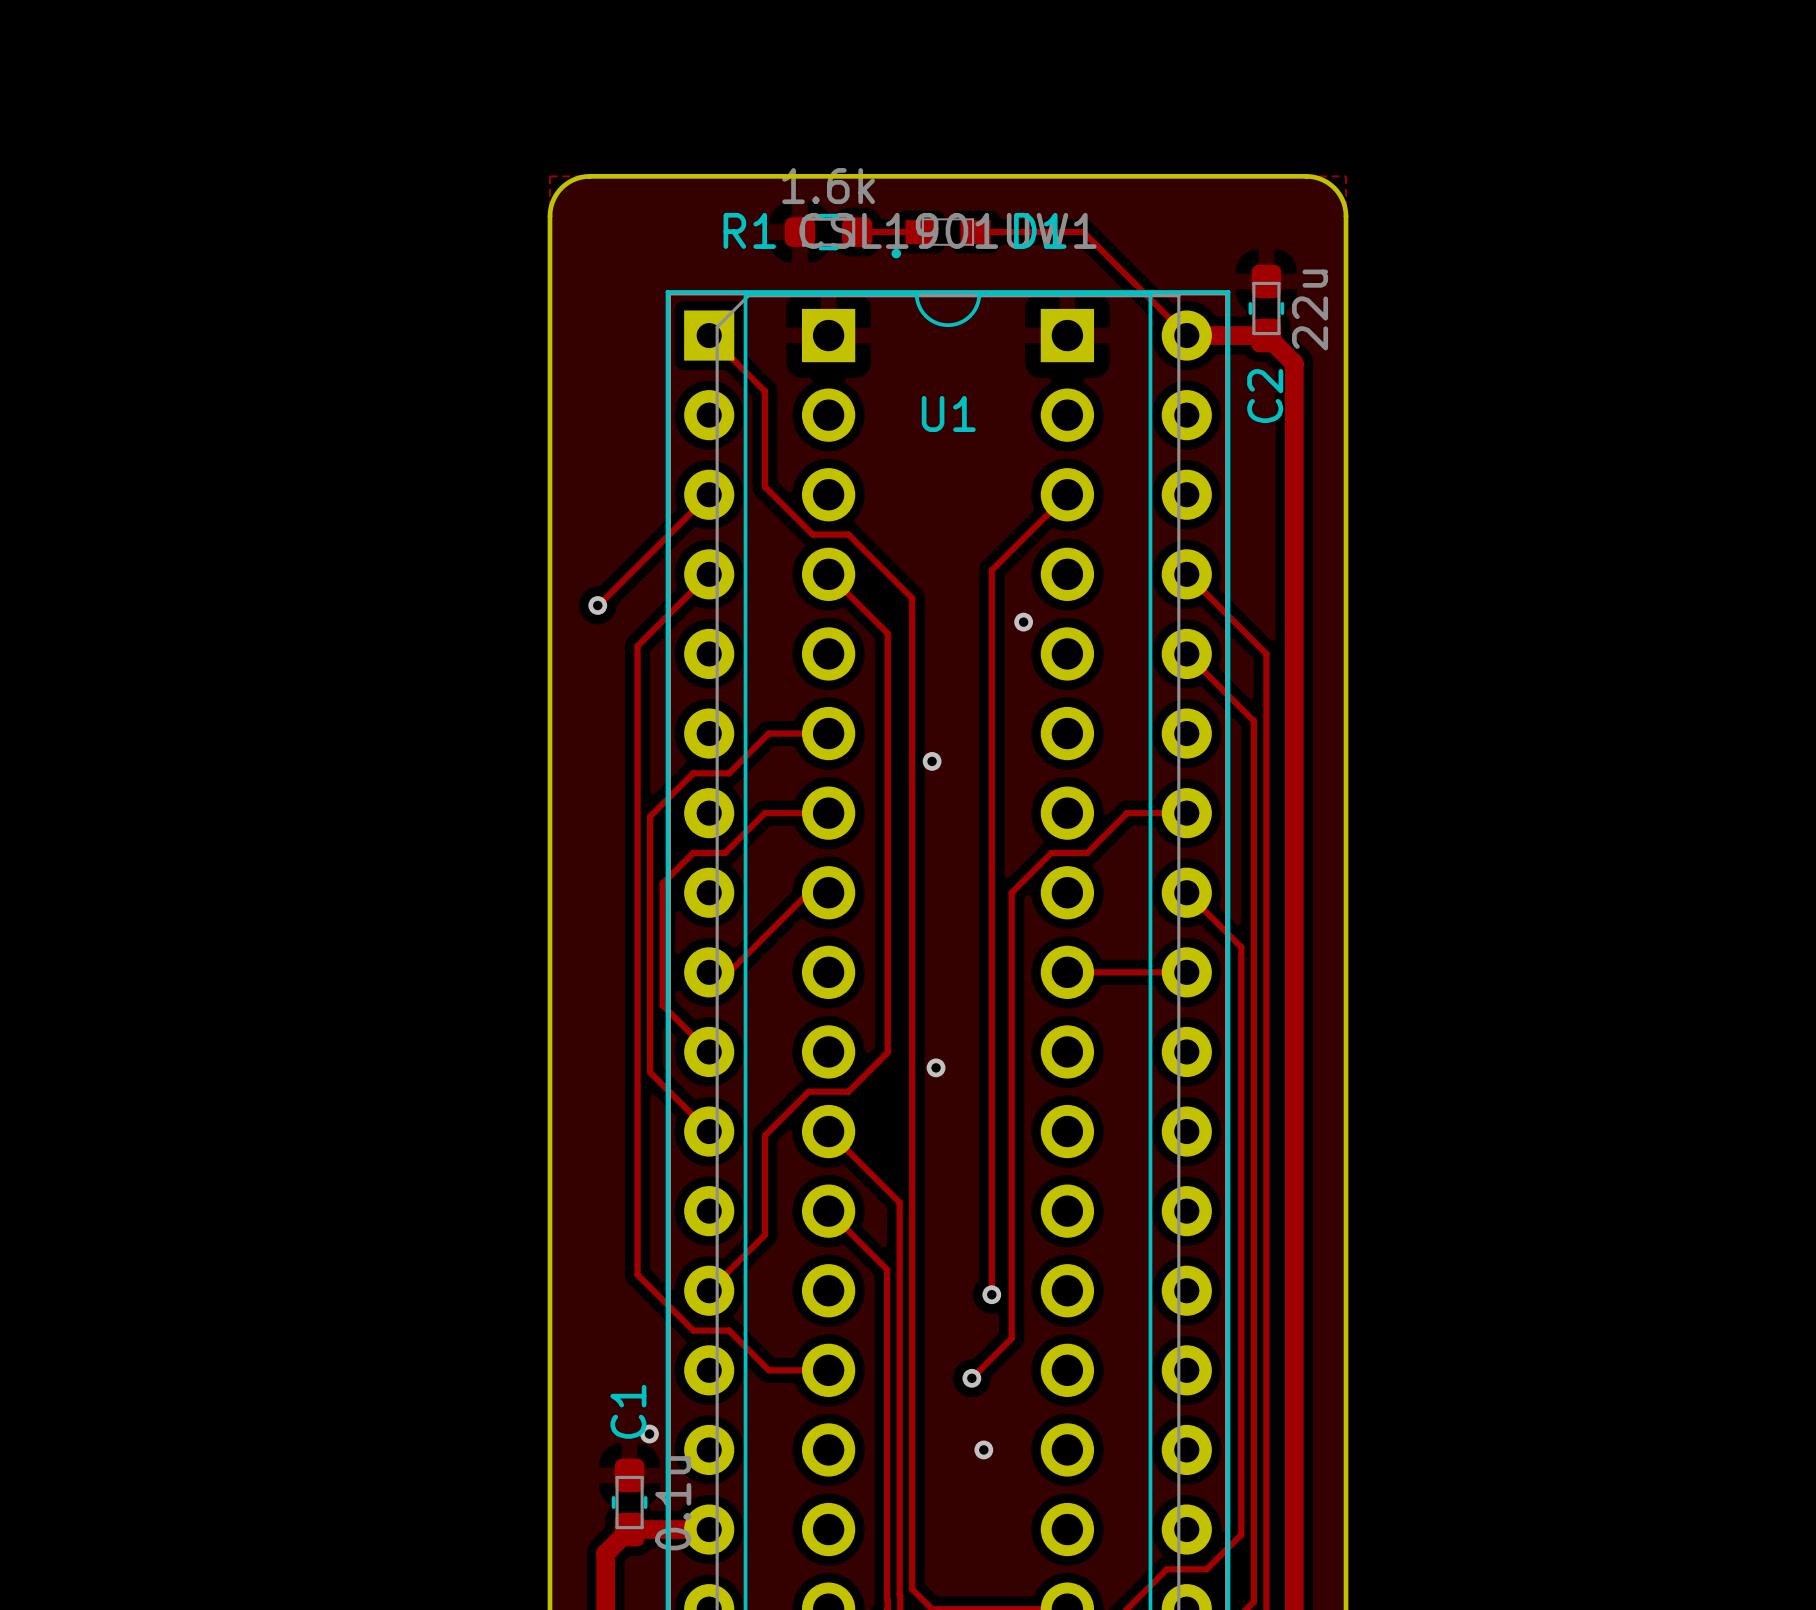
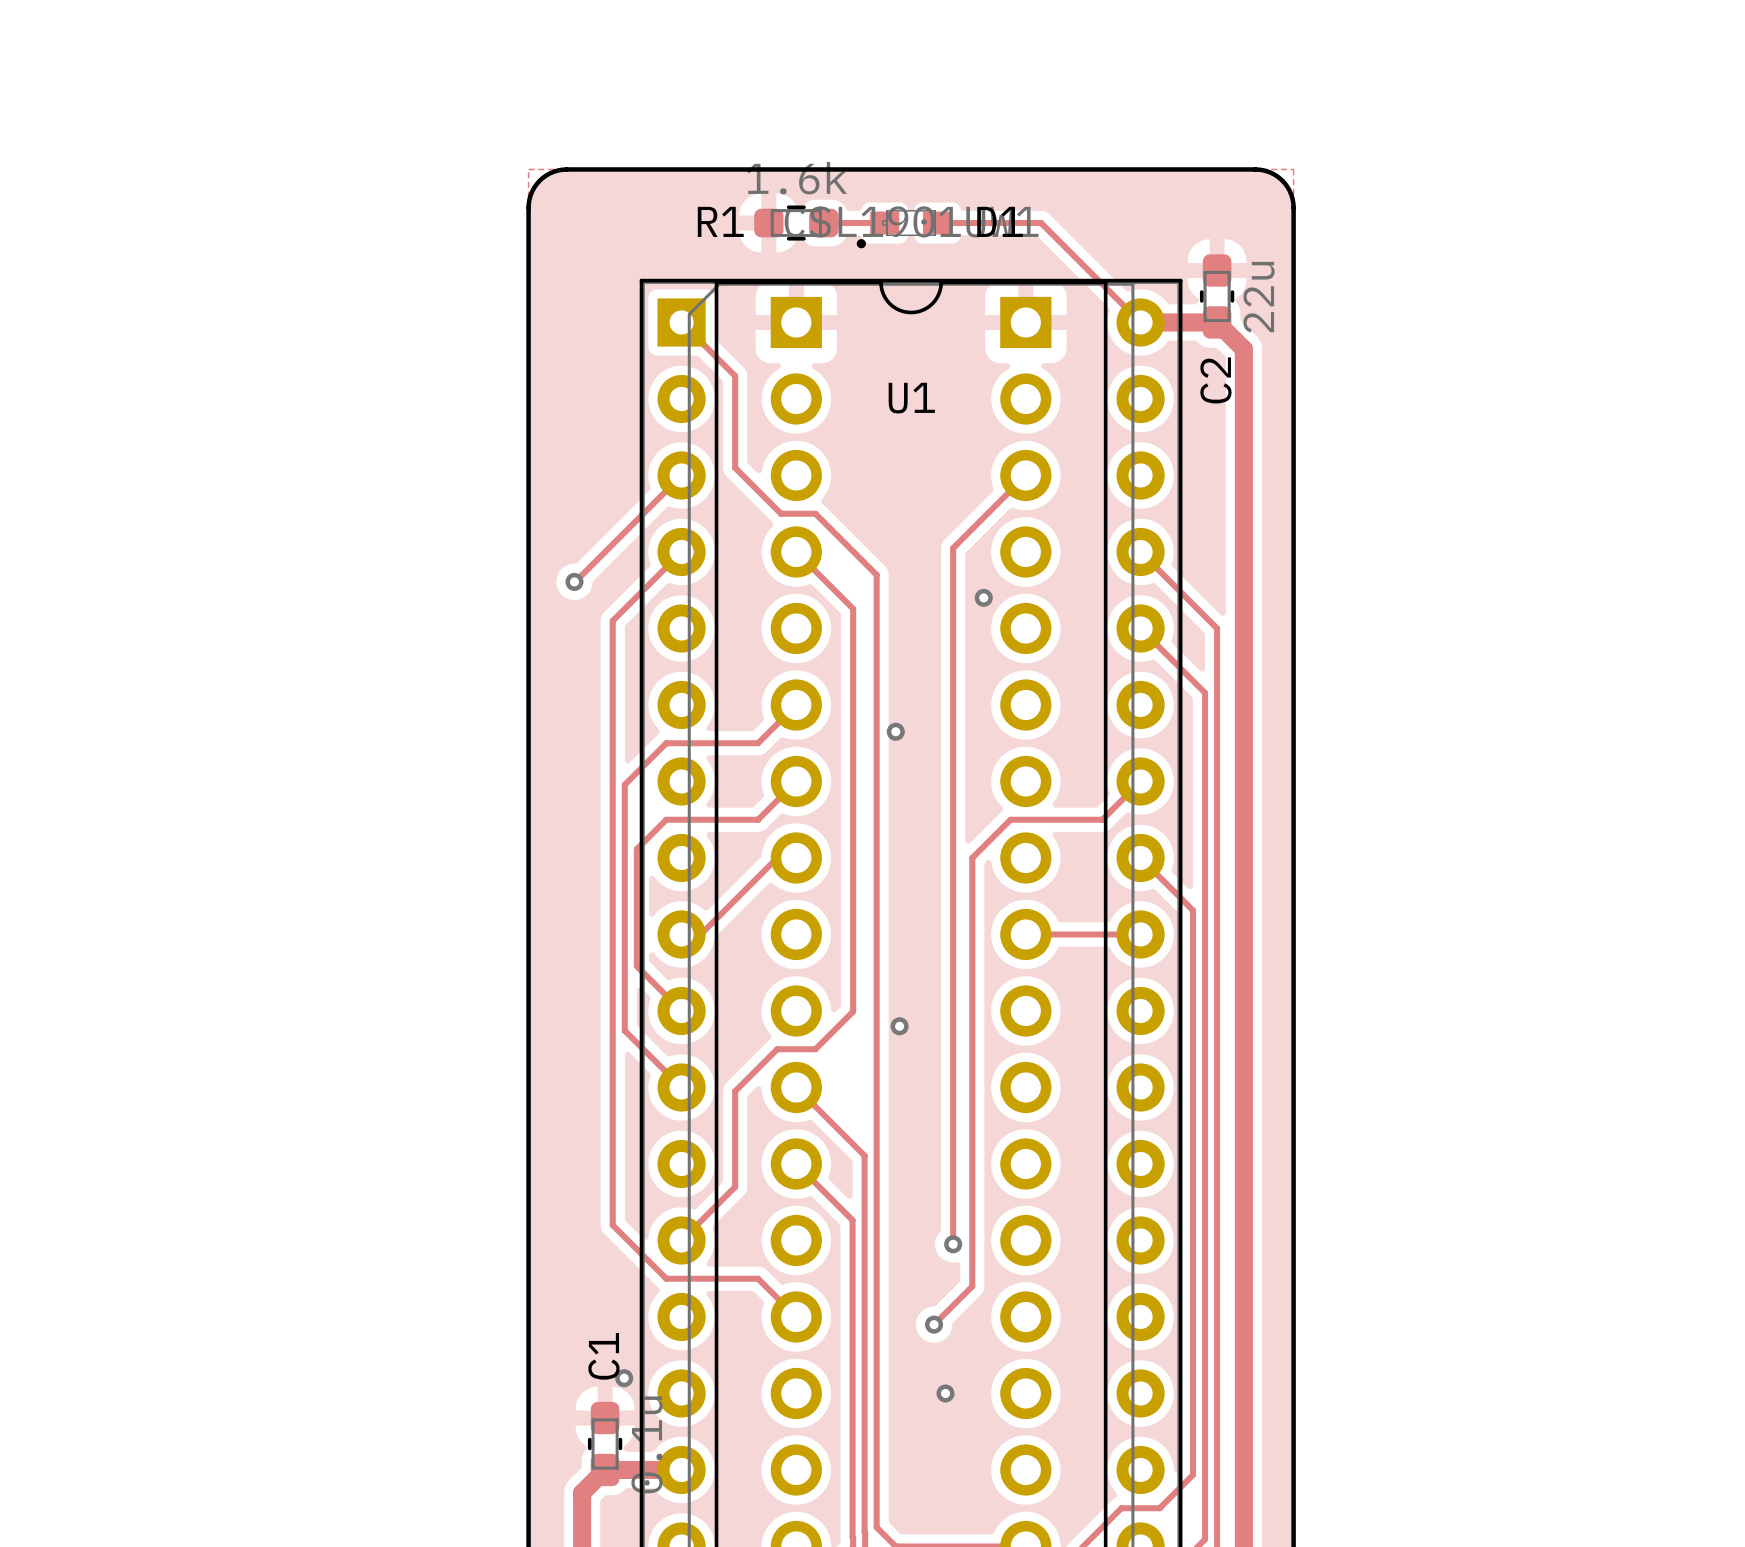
track: (828, 733) (768, 733) (729, 773) -> (796, 704) (758, 743) (700, 743)
track: (828, 813) (764, 813) (725, 852) -> (796, 781) (758, 819) (696, 819)
track: (1186, 813) (1127, 813) (1087, 852) -> (1140, 781) (1102, 819) (1044, 819)
track: (729, 1330) (768, 1370) (828, 1370) -> (700, 1278) (758, 1278) (796, 1316)

